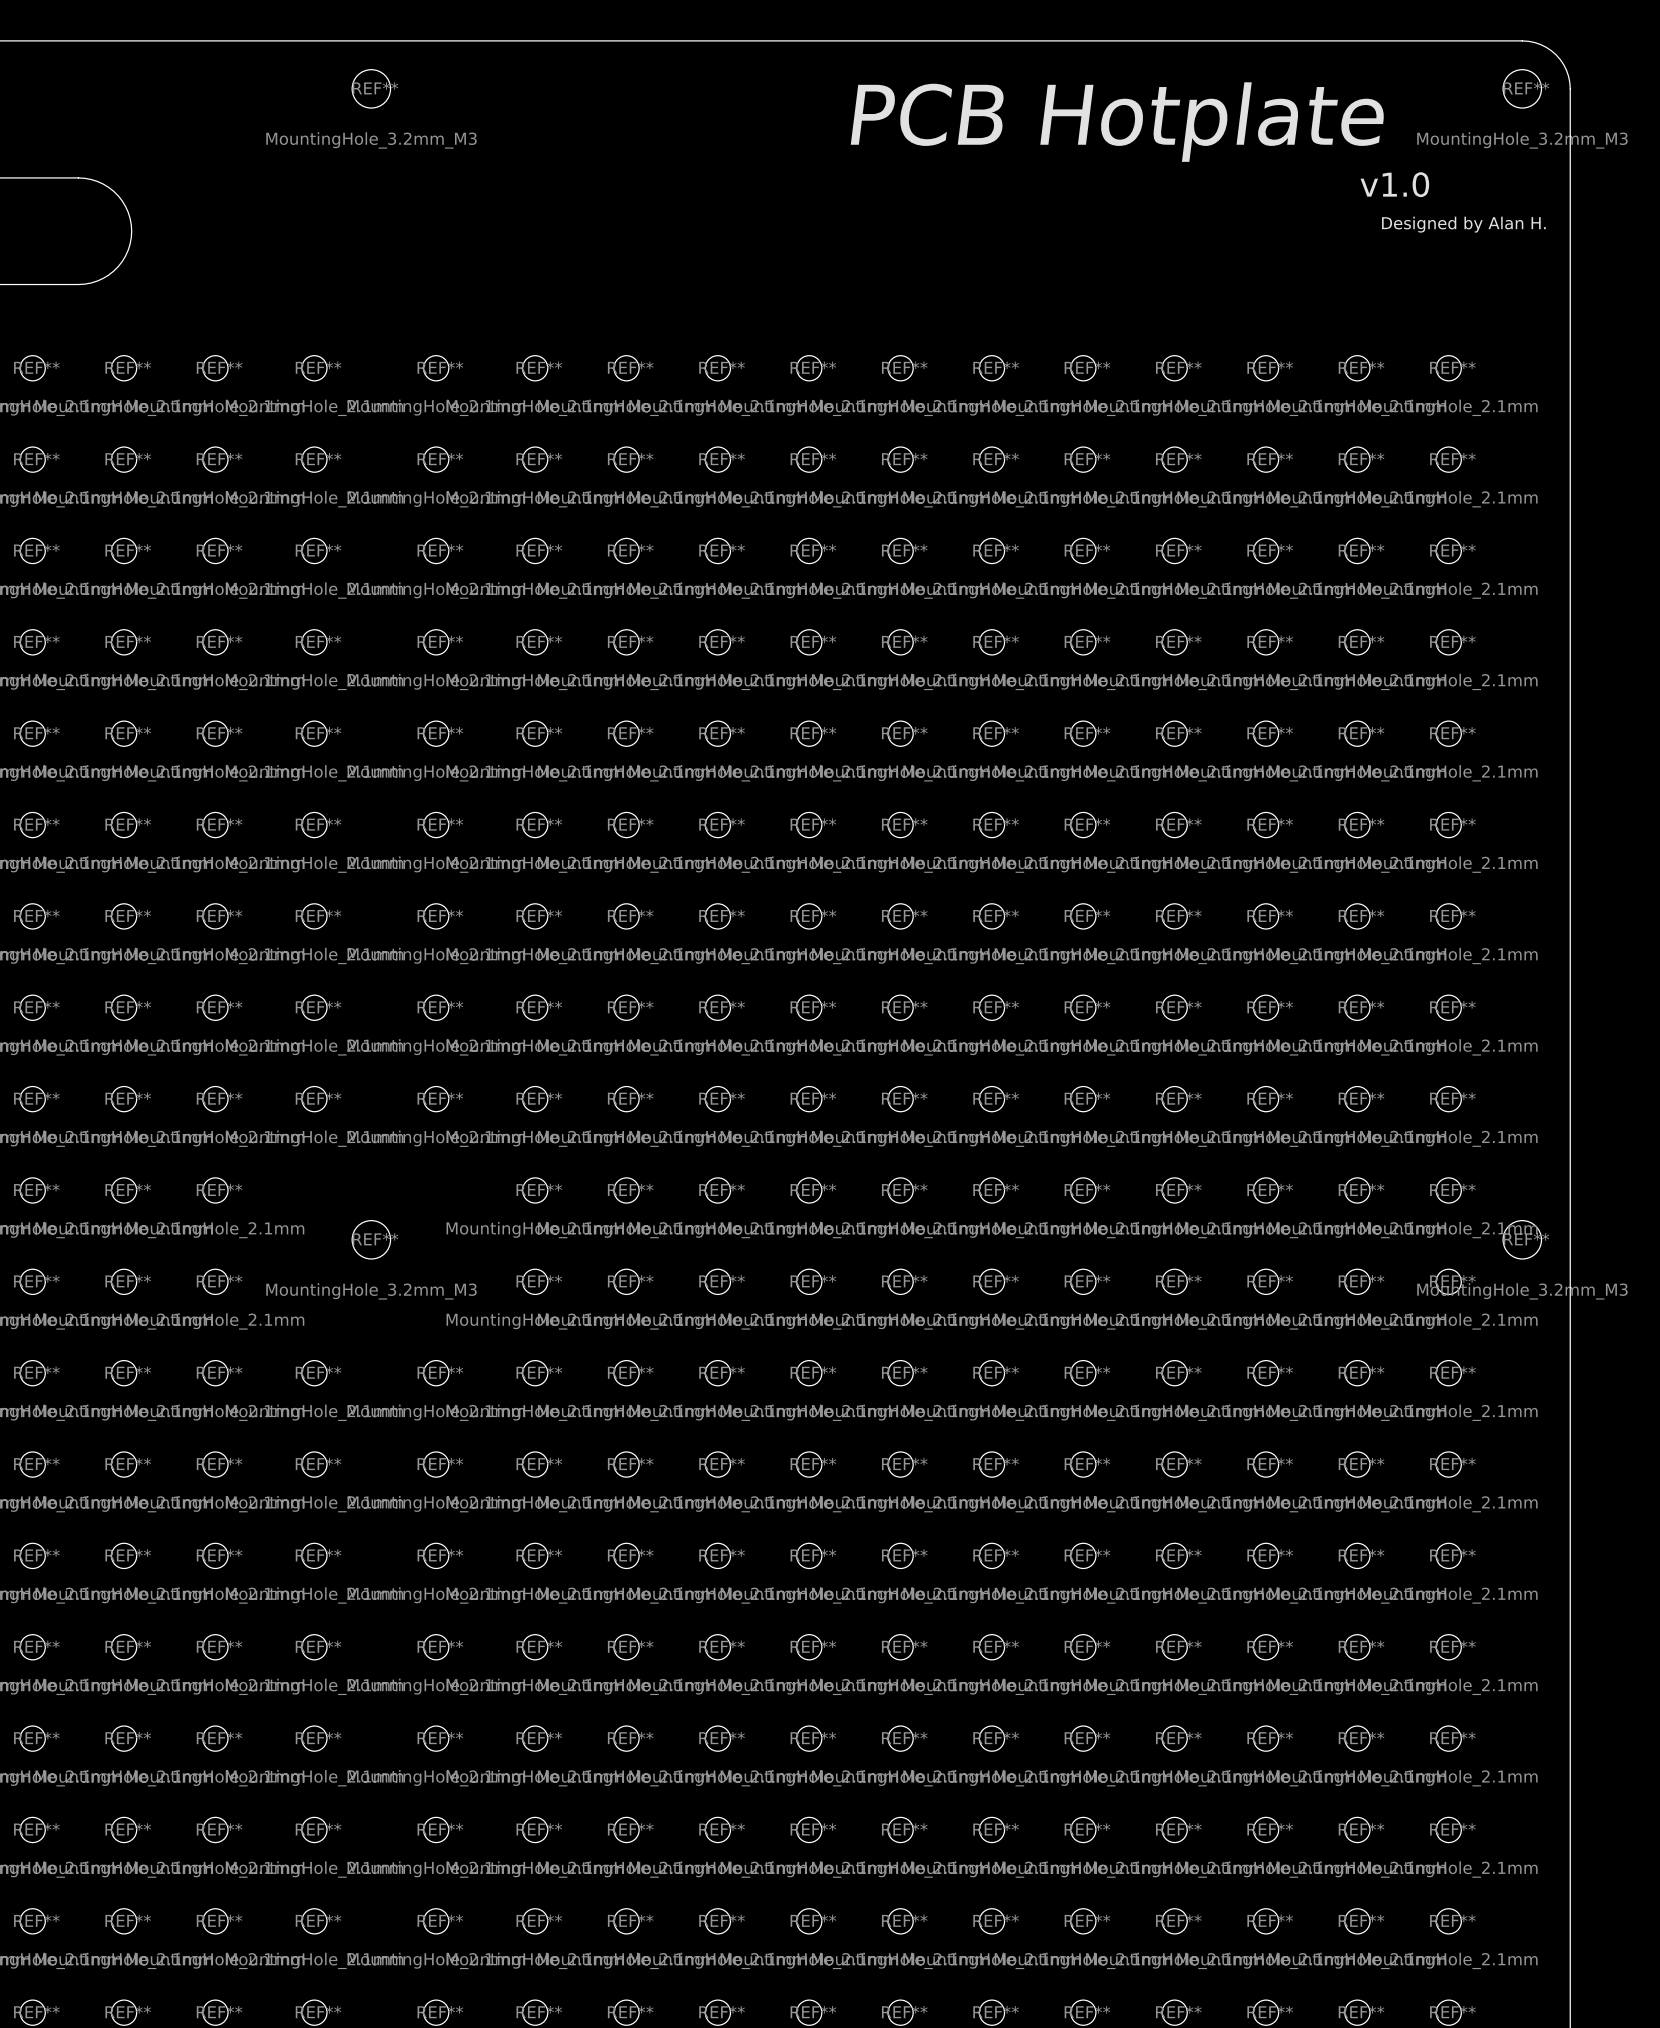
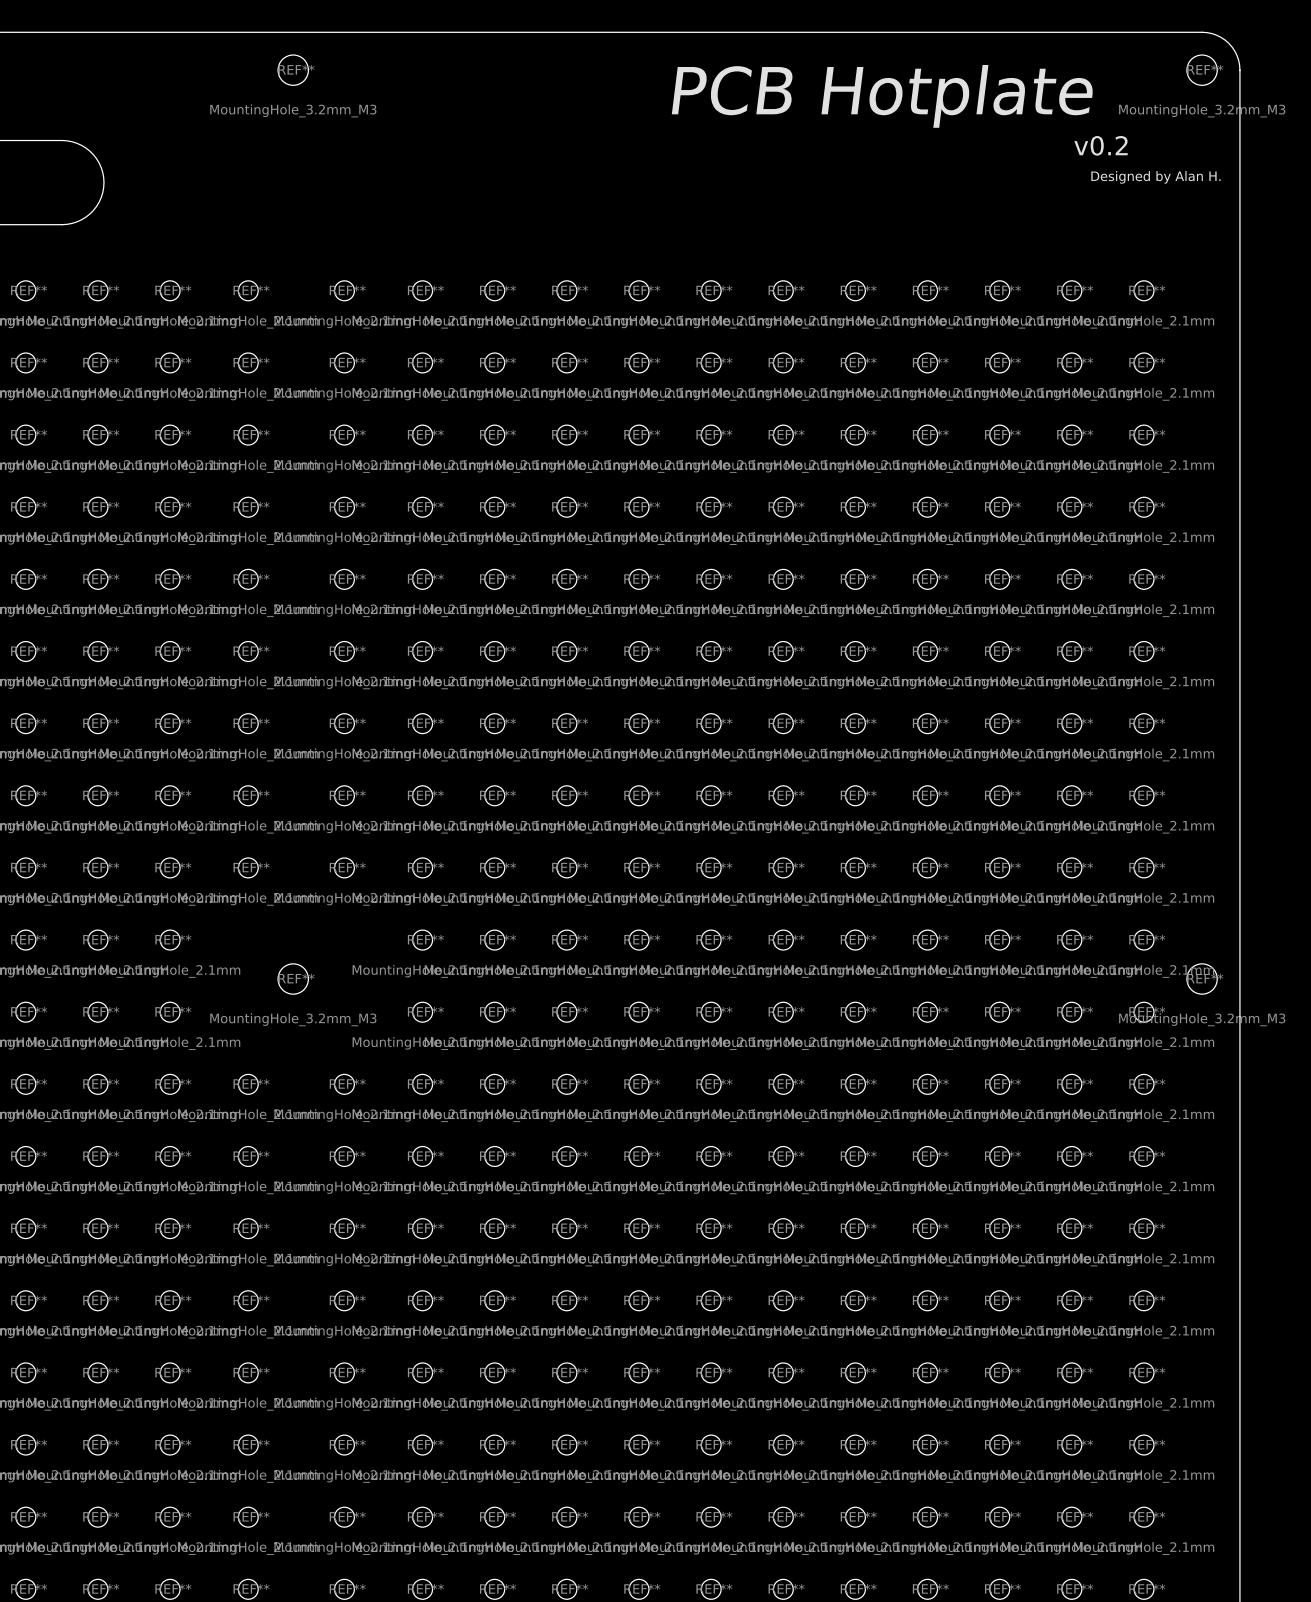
text: v1.0 (1394, 184) -> v0.2 (1101, 145)

